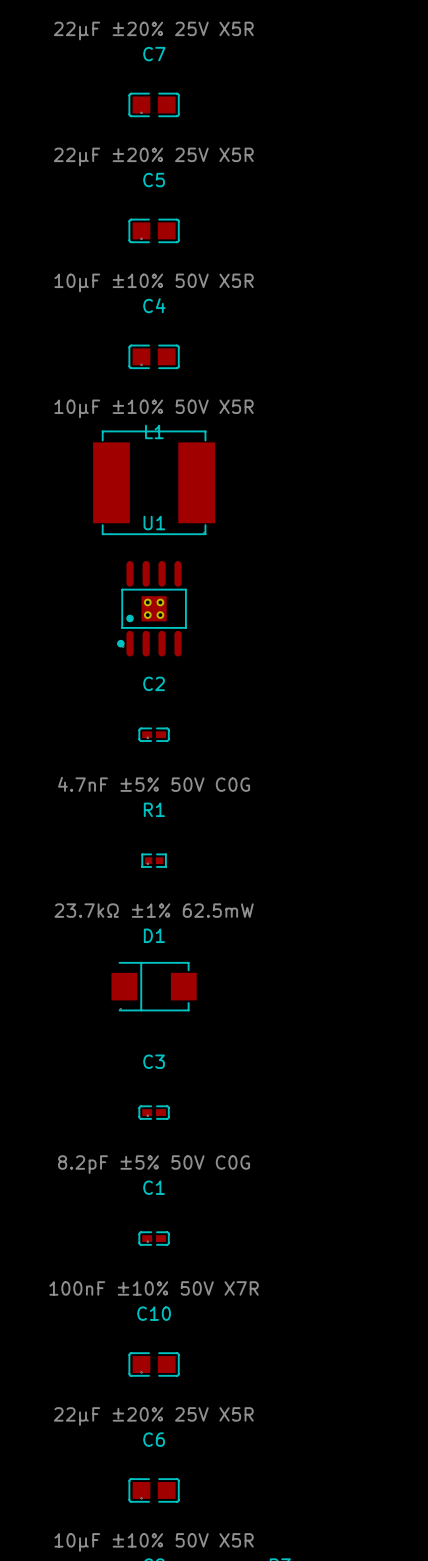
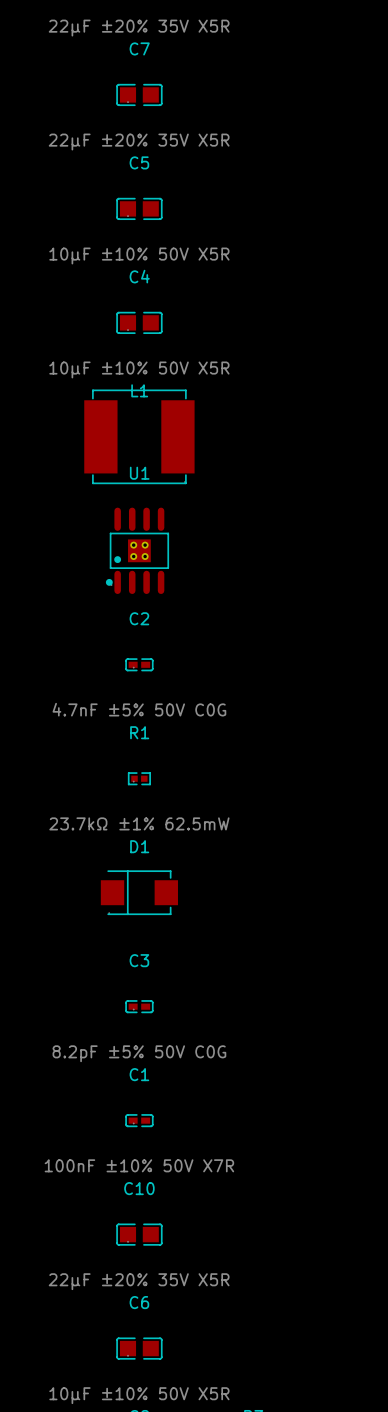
part value: 22µF ±20% 25V X5R (153, 31) -> 22µF ±20% 35V X5R (139, 28)
C7 value: 22µF ±20% 25V X5R (153, 156) -> 22µF ±20% 35V X5R (139, 142)
C10 value: 22µF ±20% 25V X5R (153, 1416) -> 22µF ±20% 35V X5R (139, 1281)

